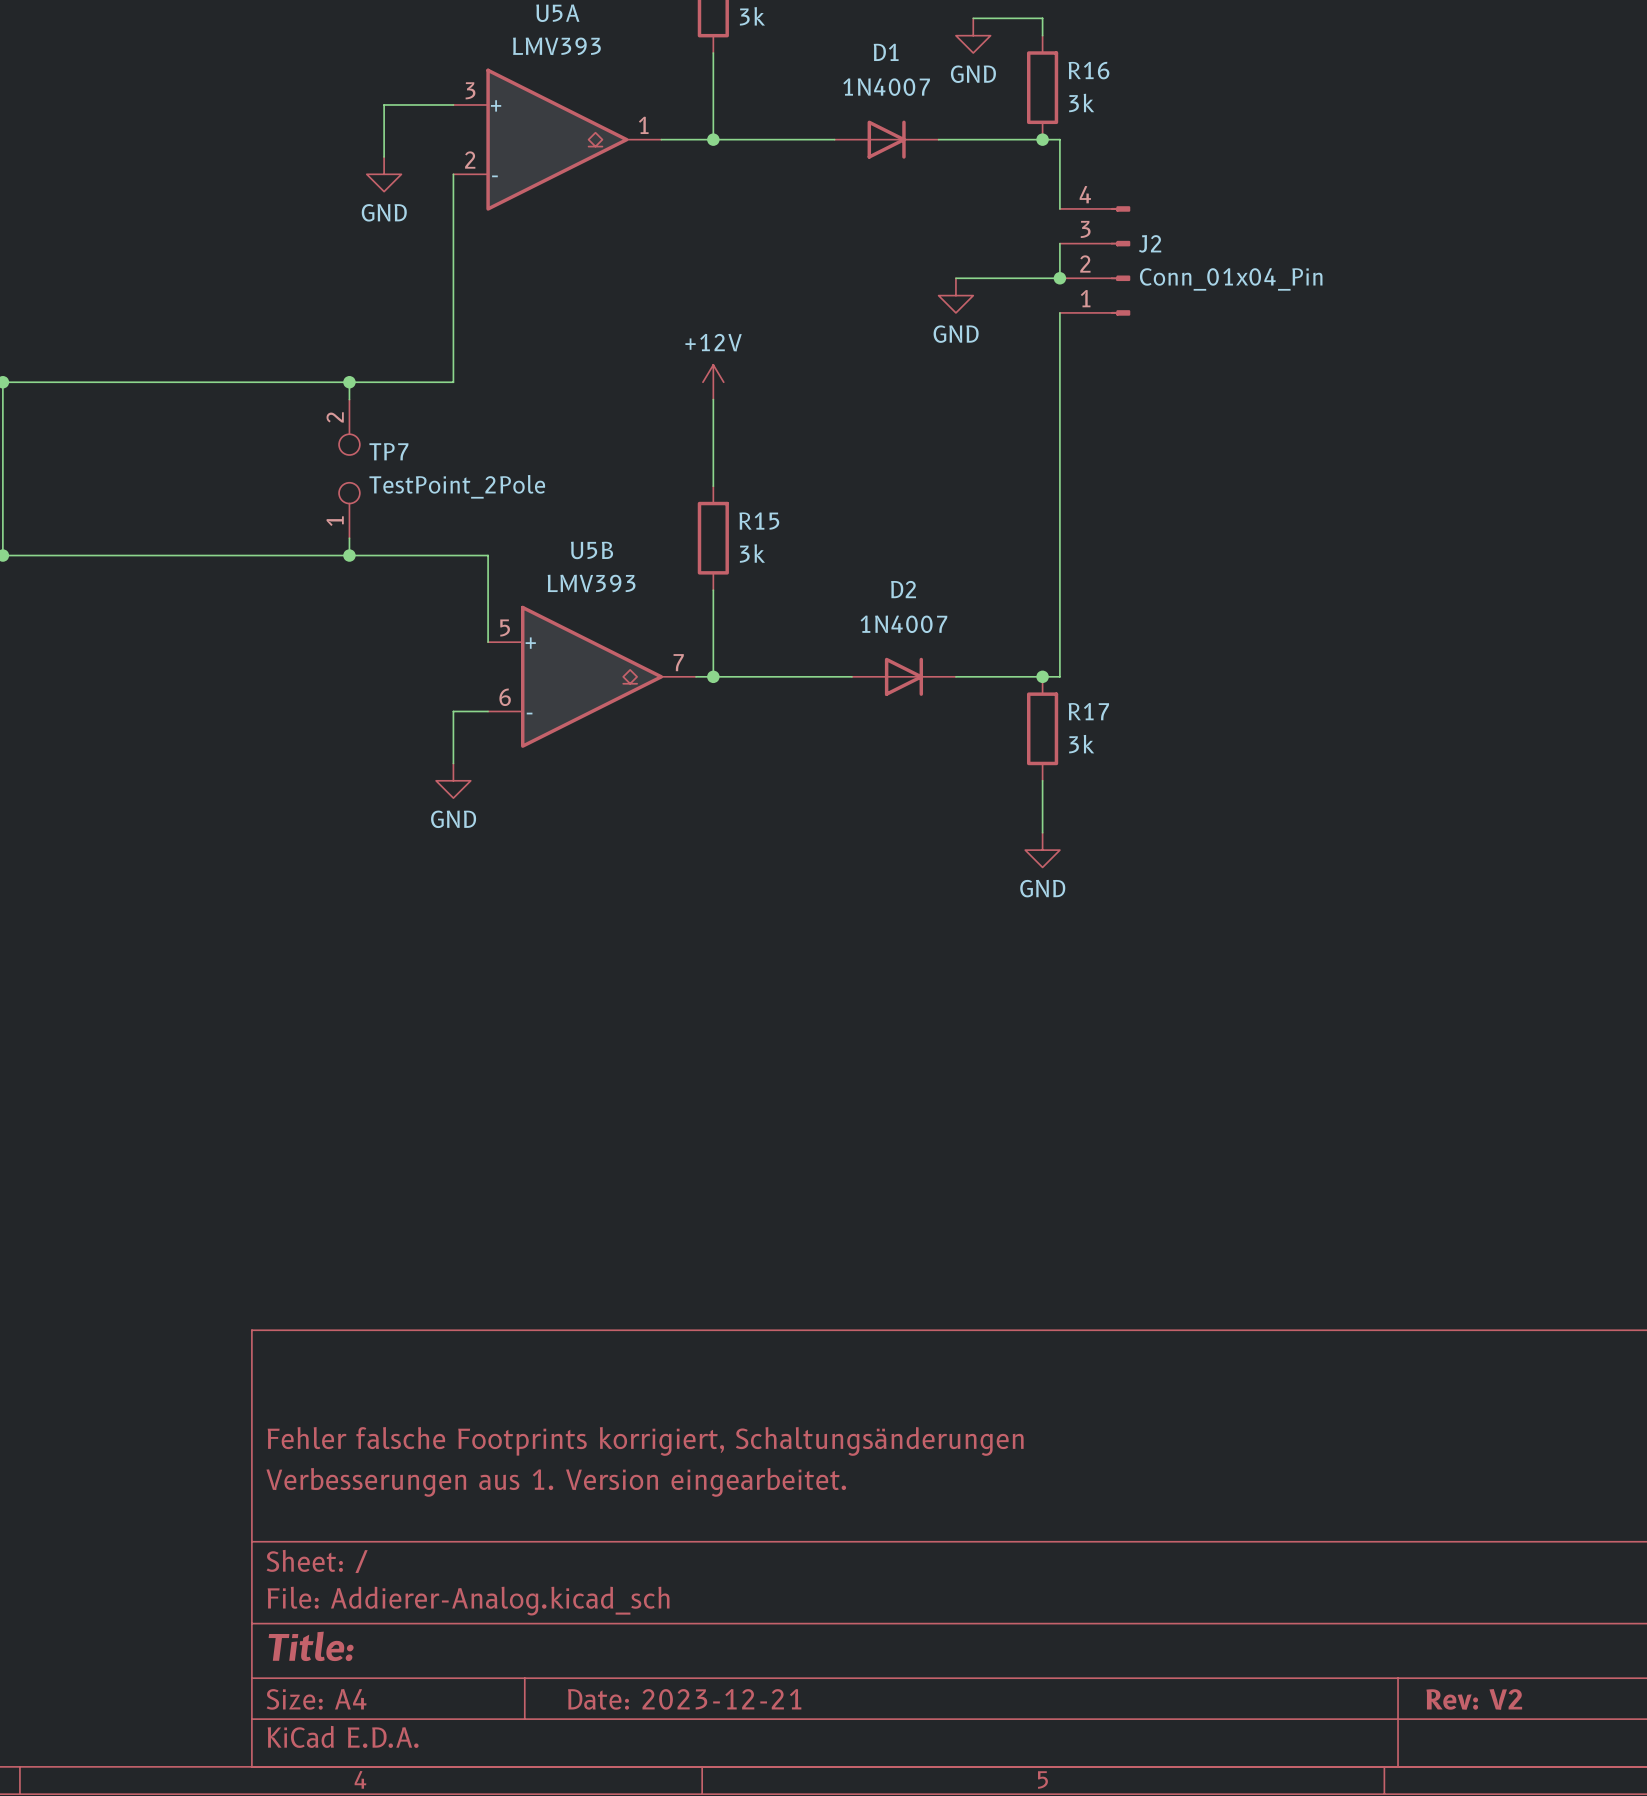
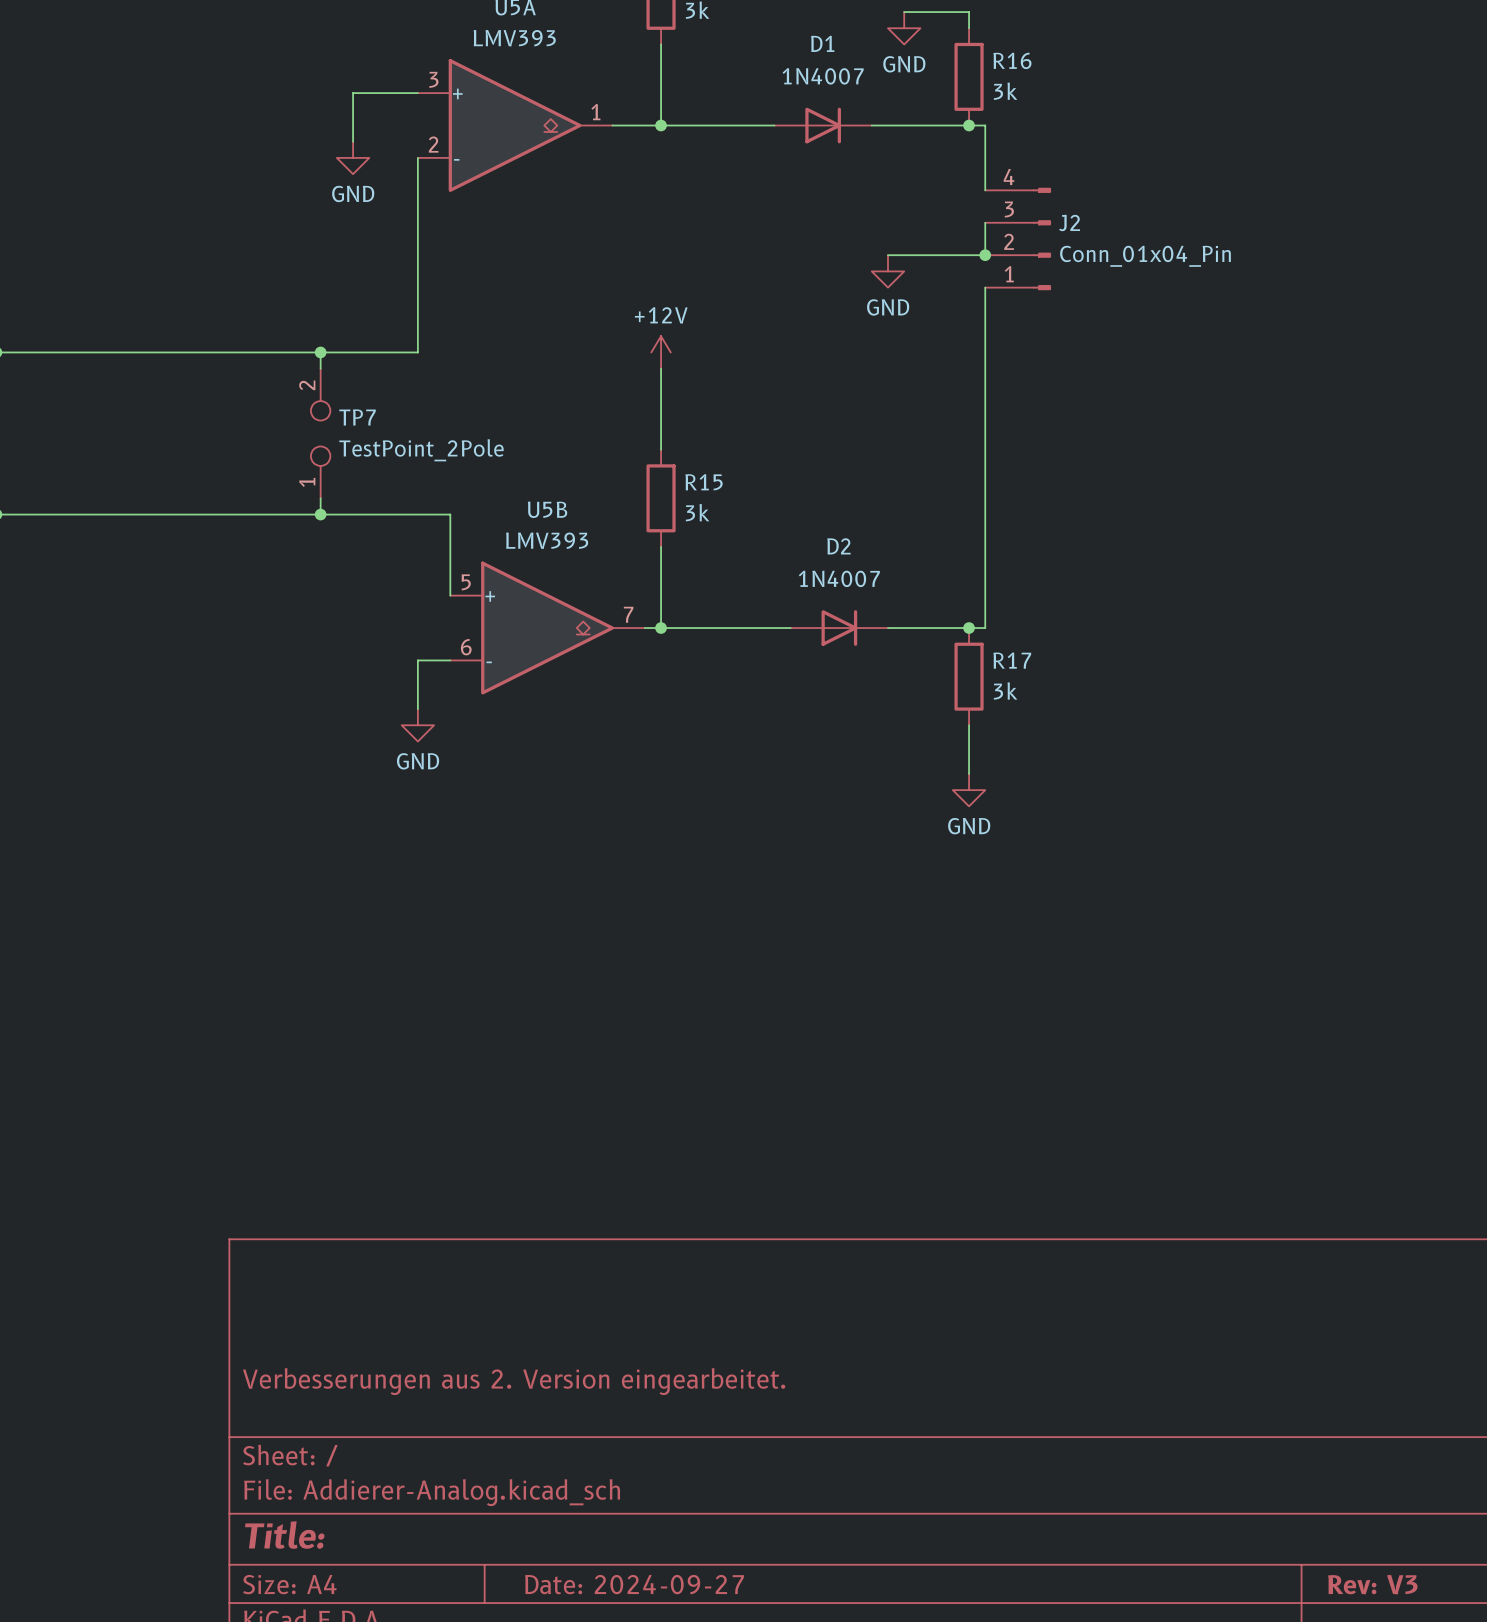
title block: Fehler falsche Footprints korrigiert, Schaltungsänderungen (645, 1441) -> none
title block: Verbesserungen aus 1. Version eingearbeitet. (556, 1482) -> Verbesserungen aus 2. Version eingearbeitet. (514, 1381)
title block: Date: 2023-12-21 (684, 1699) -> Date: 2024-09-27 (634, 1584)
title block: Rev: V2 (1474, 1699) -> Rev: V3 (1372, 1584)

